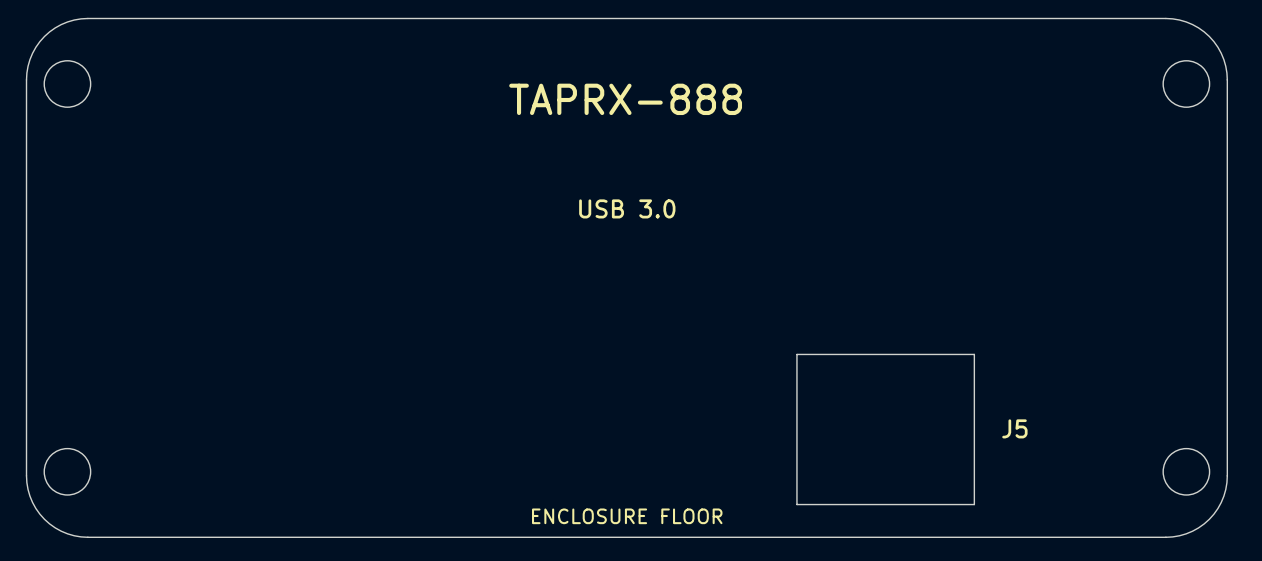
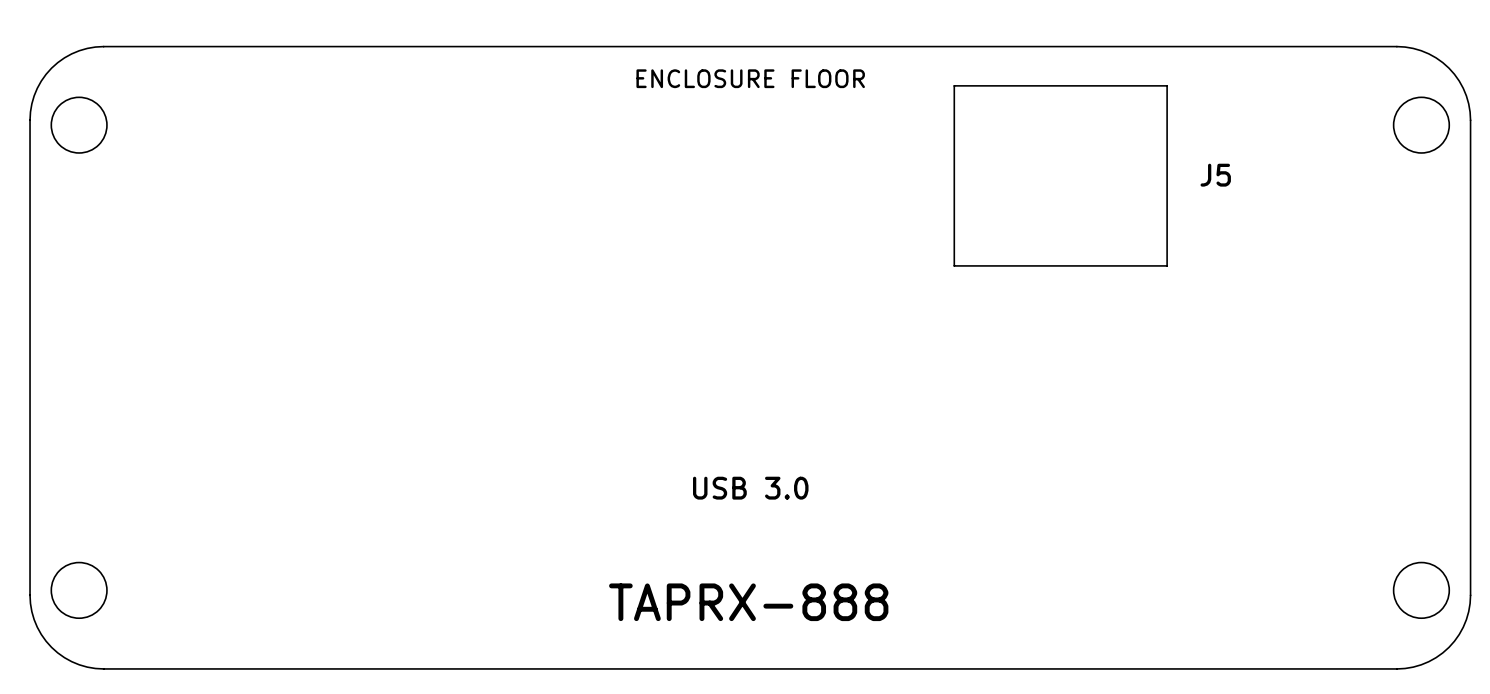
text: none -> ENCLOSURE FLOOR (750, 78)
text: TAPRX-888 (625, 99) -> none
text position: USB 3.0 (627, 208) -> USB 3.0 (750, 488)
board edge: (796, 354) (974, 354) (974, 504) (796, 504) (796, 354) -> (954, 85) (1167, 85) (1167, 265) (954, 265) (954, 85)
text position: J5 (1014, 428) -> J5 (1215, 175)
text: none -> TAPRX-888 (748, 602)
text: ENCLOSURE FLOOR (627, 516) -> none

